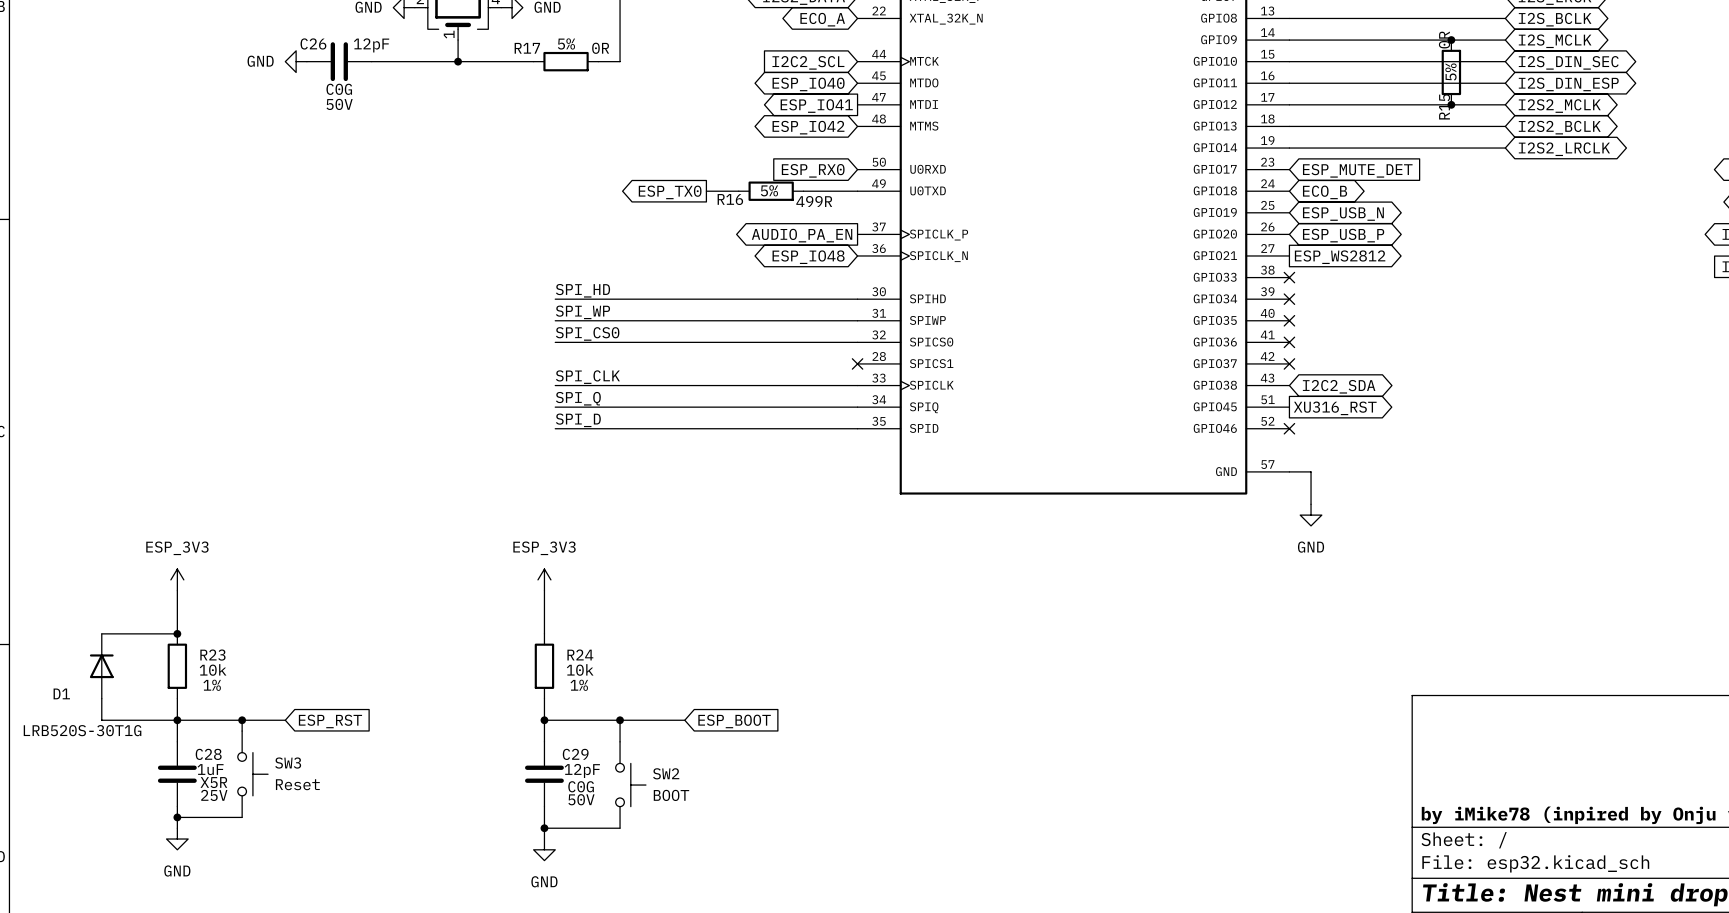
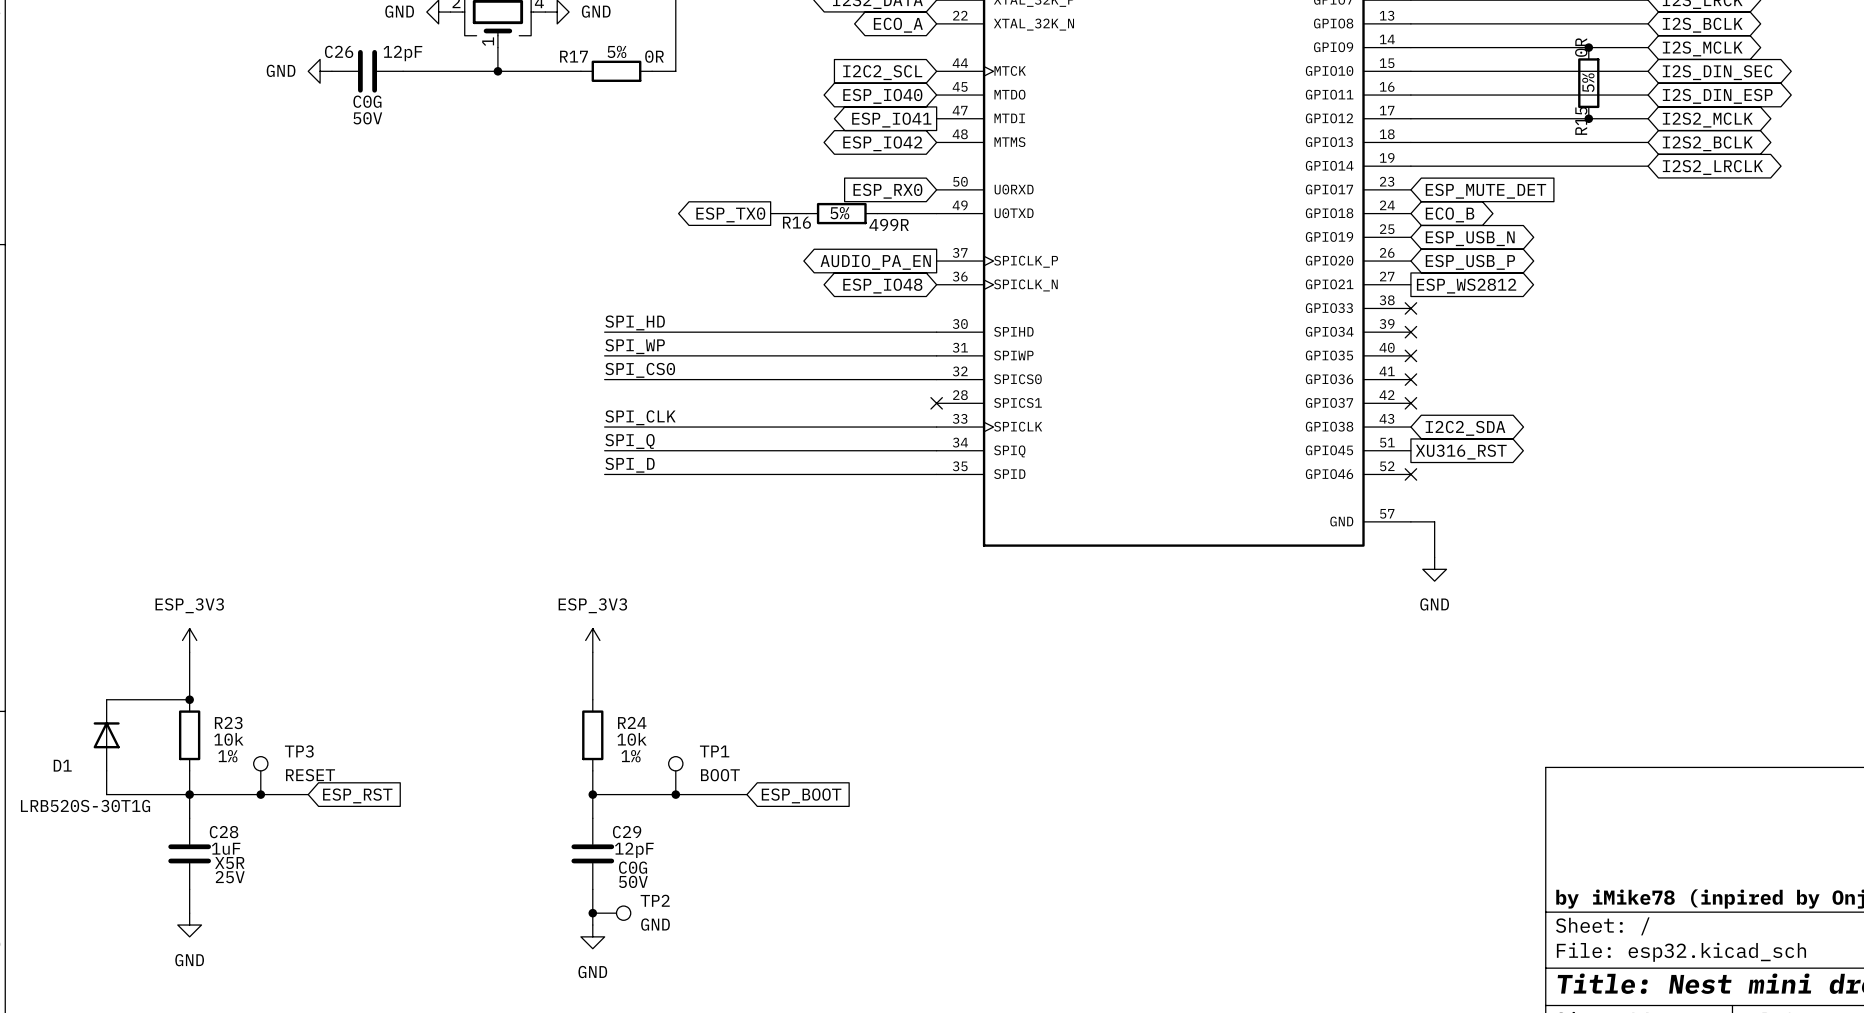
TP3: none -> RESET (260, 775)
TP1: none -> BOOT (675, 775)
wire: (242, 720) (242, 731) -> none
wire: (620, 720) (620, 741) -> none
SW3: Reset (252, 774) -> none
SW2: BOOT (630, 785) -> none
wire: (177, 817) (242, 817) -> none
junction: (177, 817) -> none
wire: (544, 828) (620, 828) -> none
TP2: none -> GND (611, 913)

